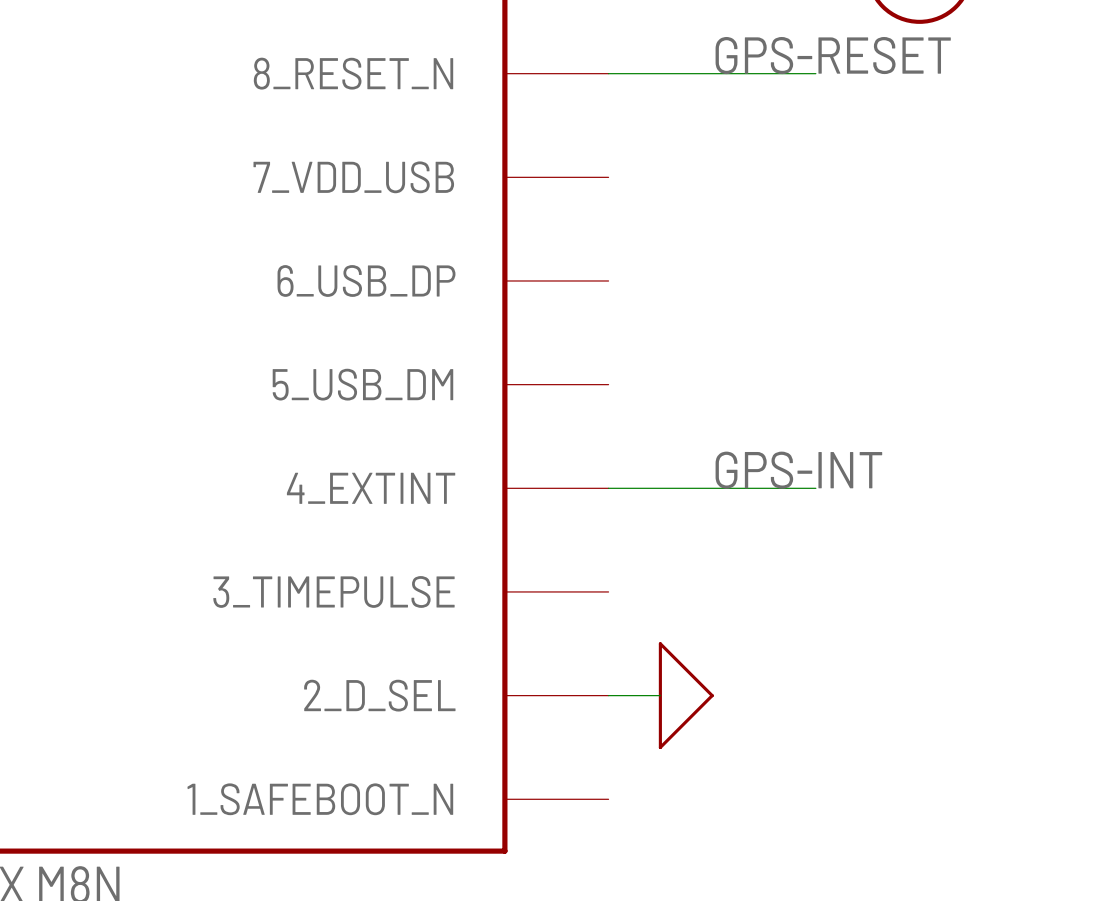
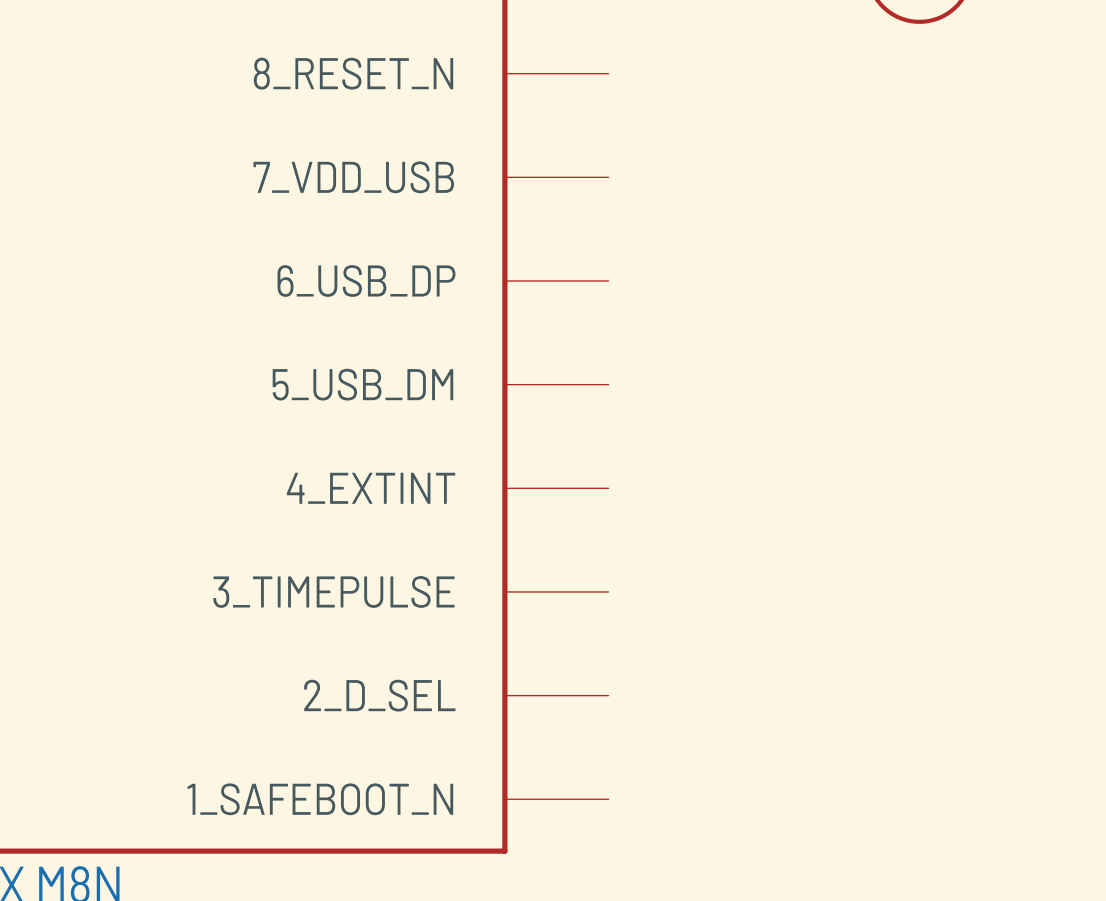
label: GPS-RESET (833, 55) -> none
wire: (608, 73) (815, 73) -> none
label: GPS-INT (798, 470) -> none
wire: (608, 488) (815, 488) -> none
wire: (608, 695) (660, 695) -> none
power symbol: (686, 695) -> none

